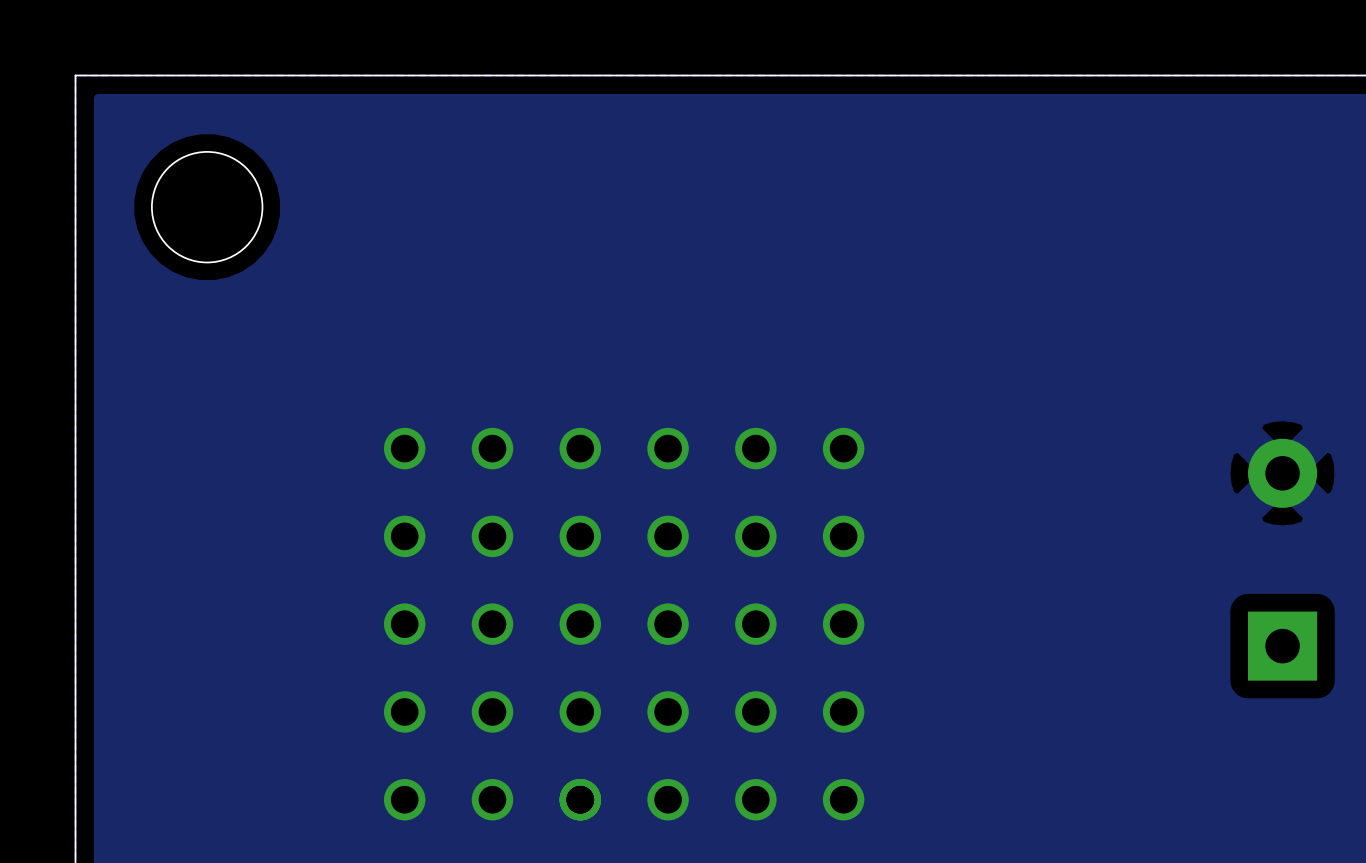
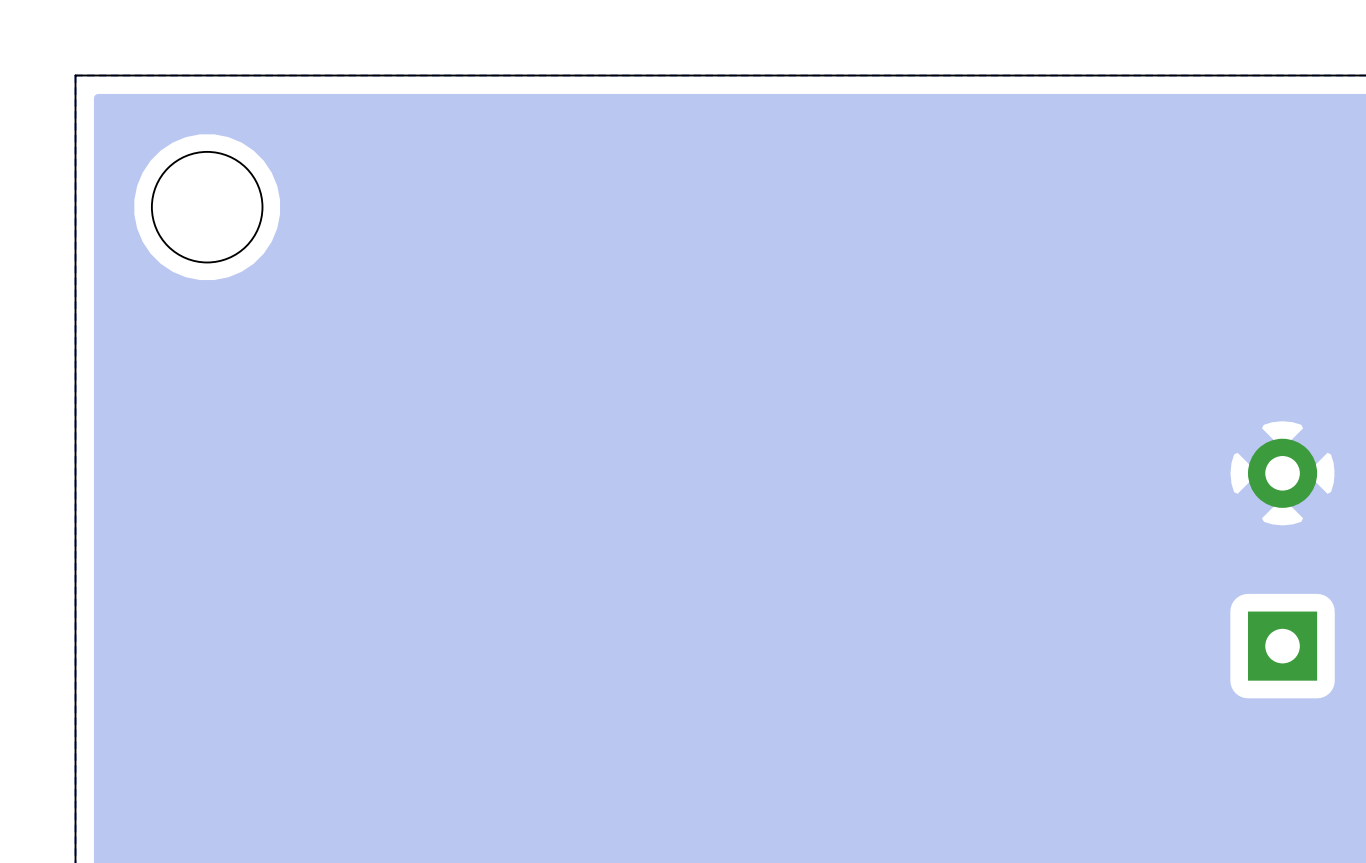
via: (404, 448) -> none
via: (492, 448) -> none
via: (580, 448) -> none
via: (668, 448) -> none
via: (755, 448) -> none
via: (843, 448) -> none
via: (404, 536) -> none
via: (492, 536) -> none
via: (580, 536) -> none
via: (668, 536) -> none
via: (755, 536) -> none
via: (843, 536) -> none
via: (404, 624) -> none
via: (492, 624) -> none
via: (580, 624) -> none
via: (668, 624) -> none
via: (755, 624) -> none
via: (843, 624) -> none
via: (404, 711) -> none
via: (492, 711) -> none
via: (580, 711) -> none
via: (668, 711) -> none
via: (755, 711) -> none
via: (843, 711) -> none
via: (404, 799) -> none
via: (492, 799) -> none
via: (580, 799) -> none
via: (668, 799) -> none
via: (755, 799) -> none
via: (843, 799) -> none

